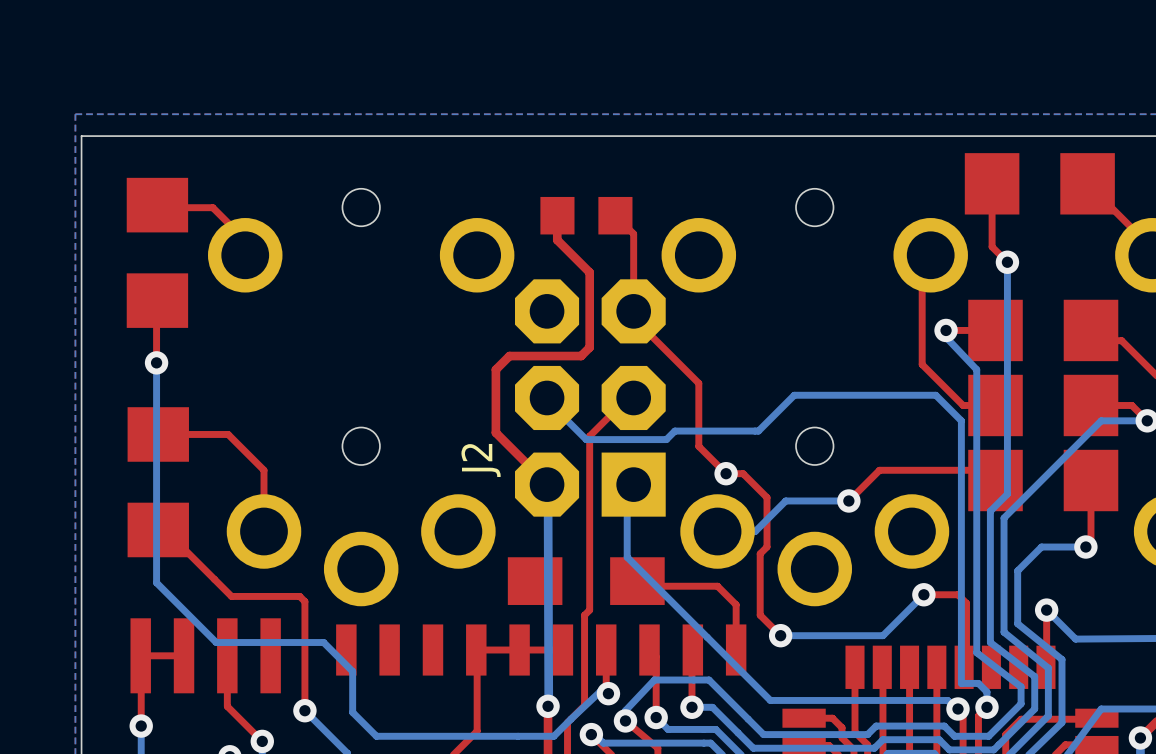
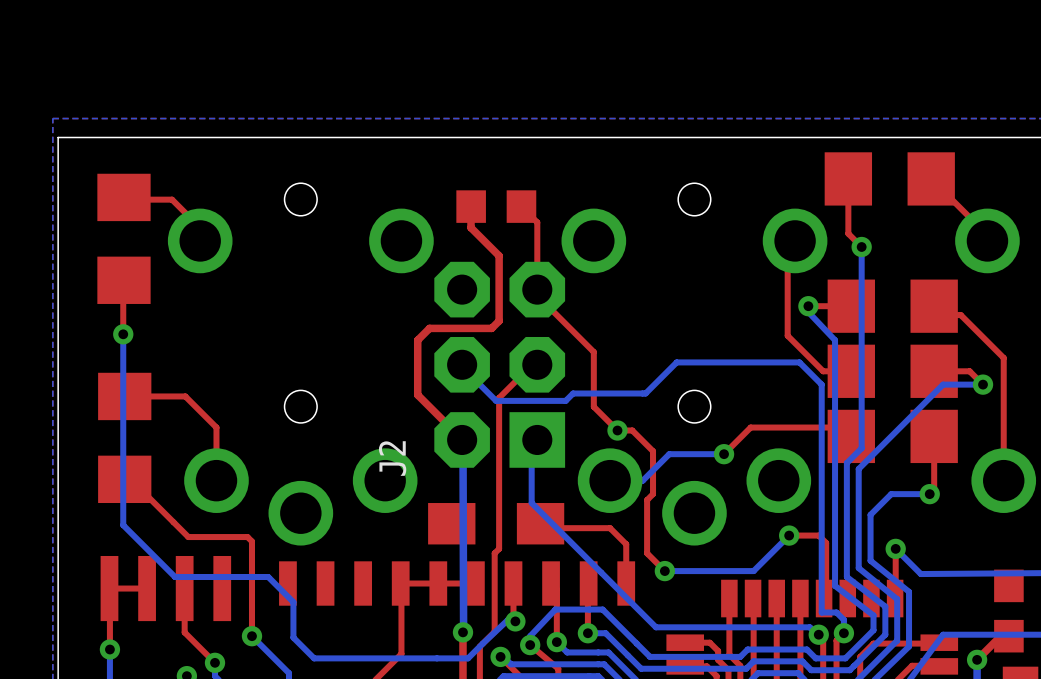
J2 name position: J2 (481, 460) -> J2 (392, 458)

